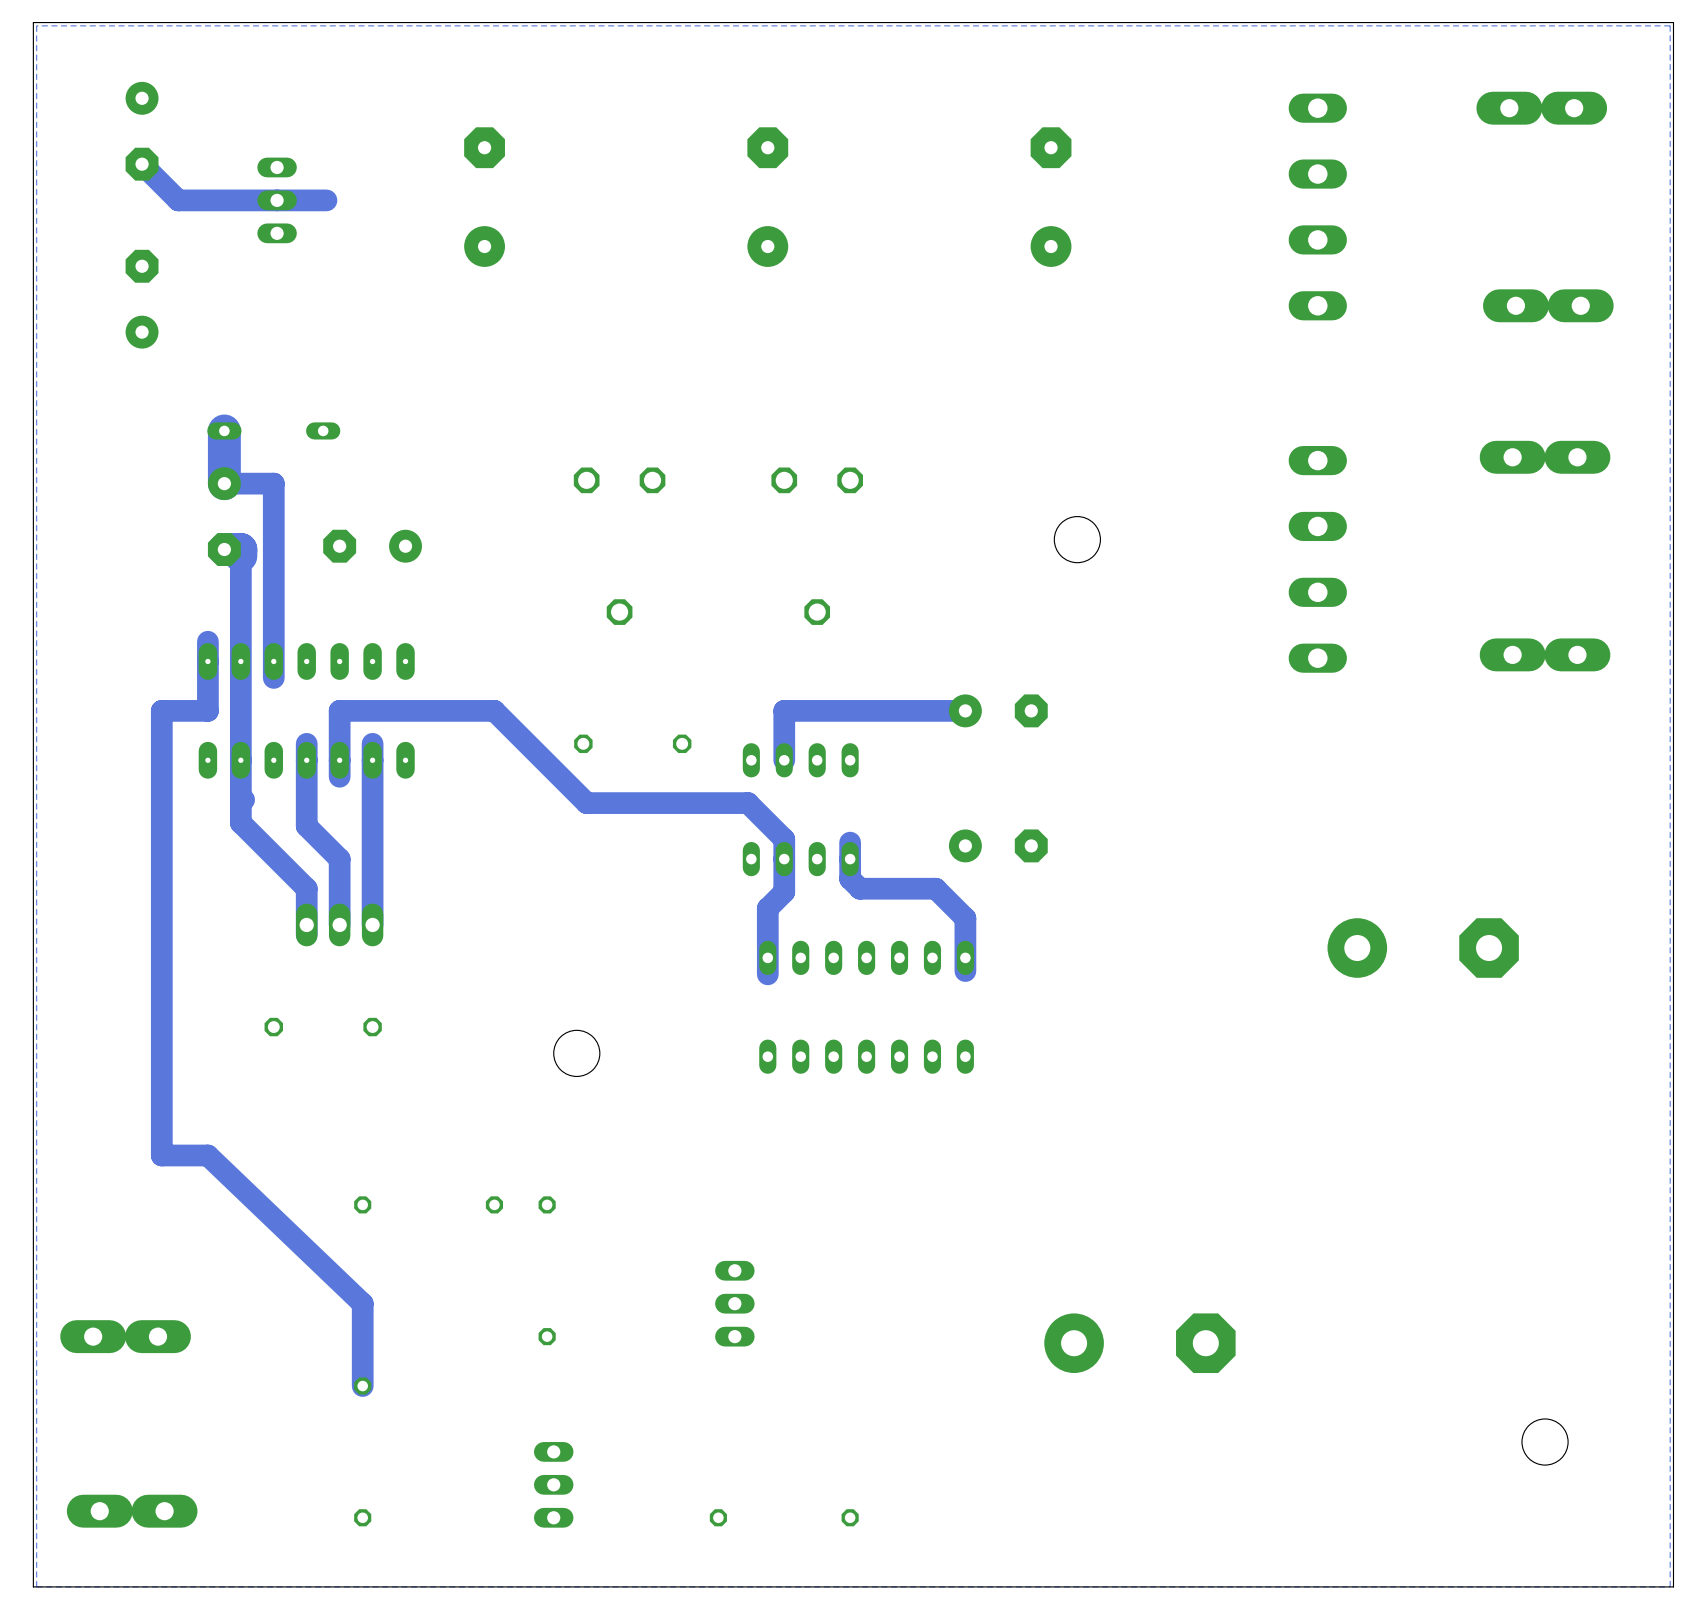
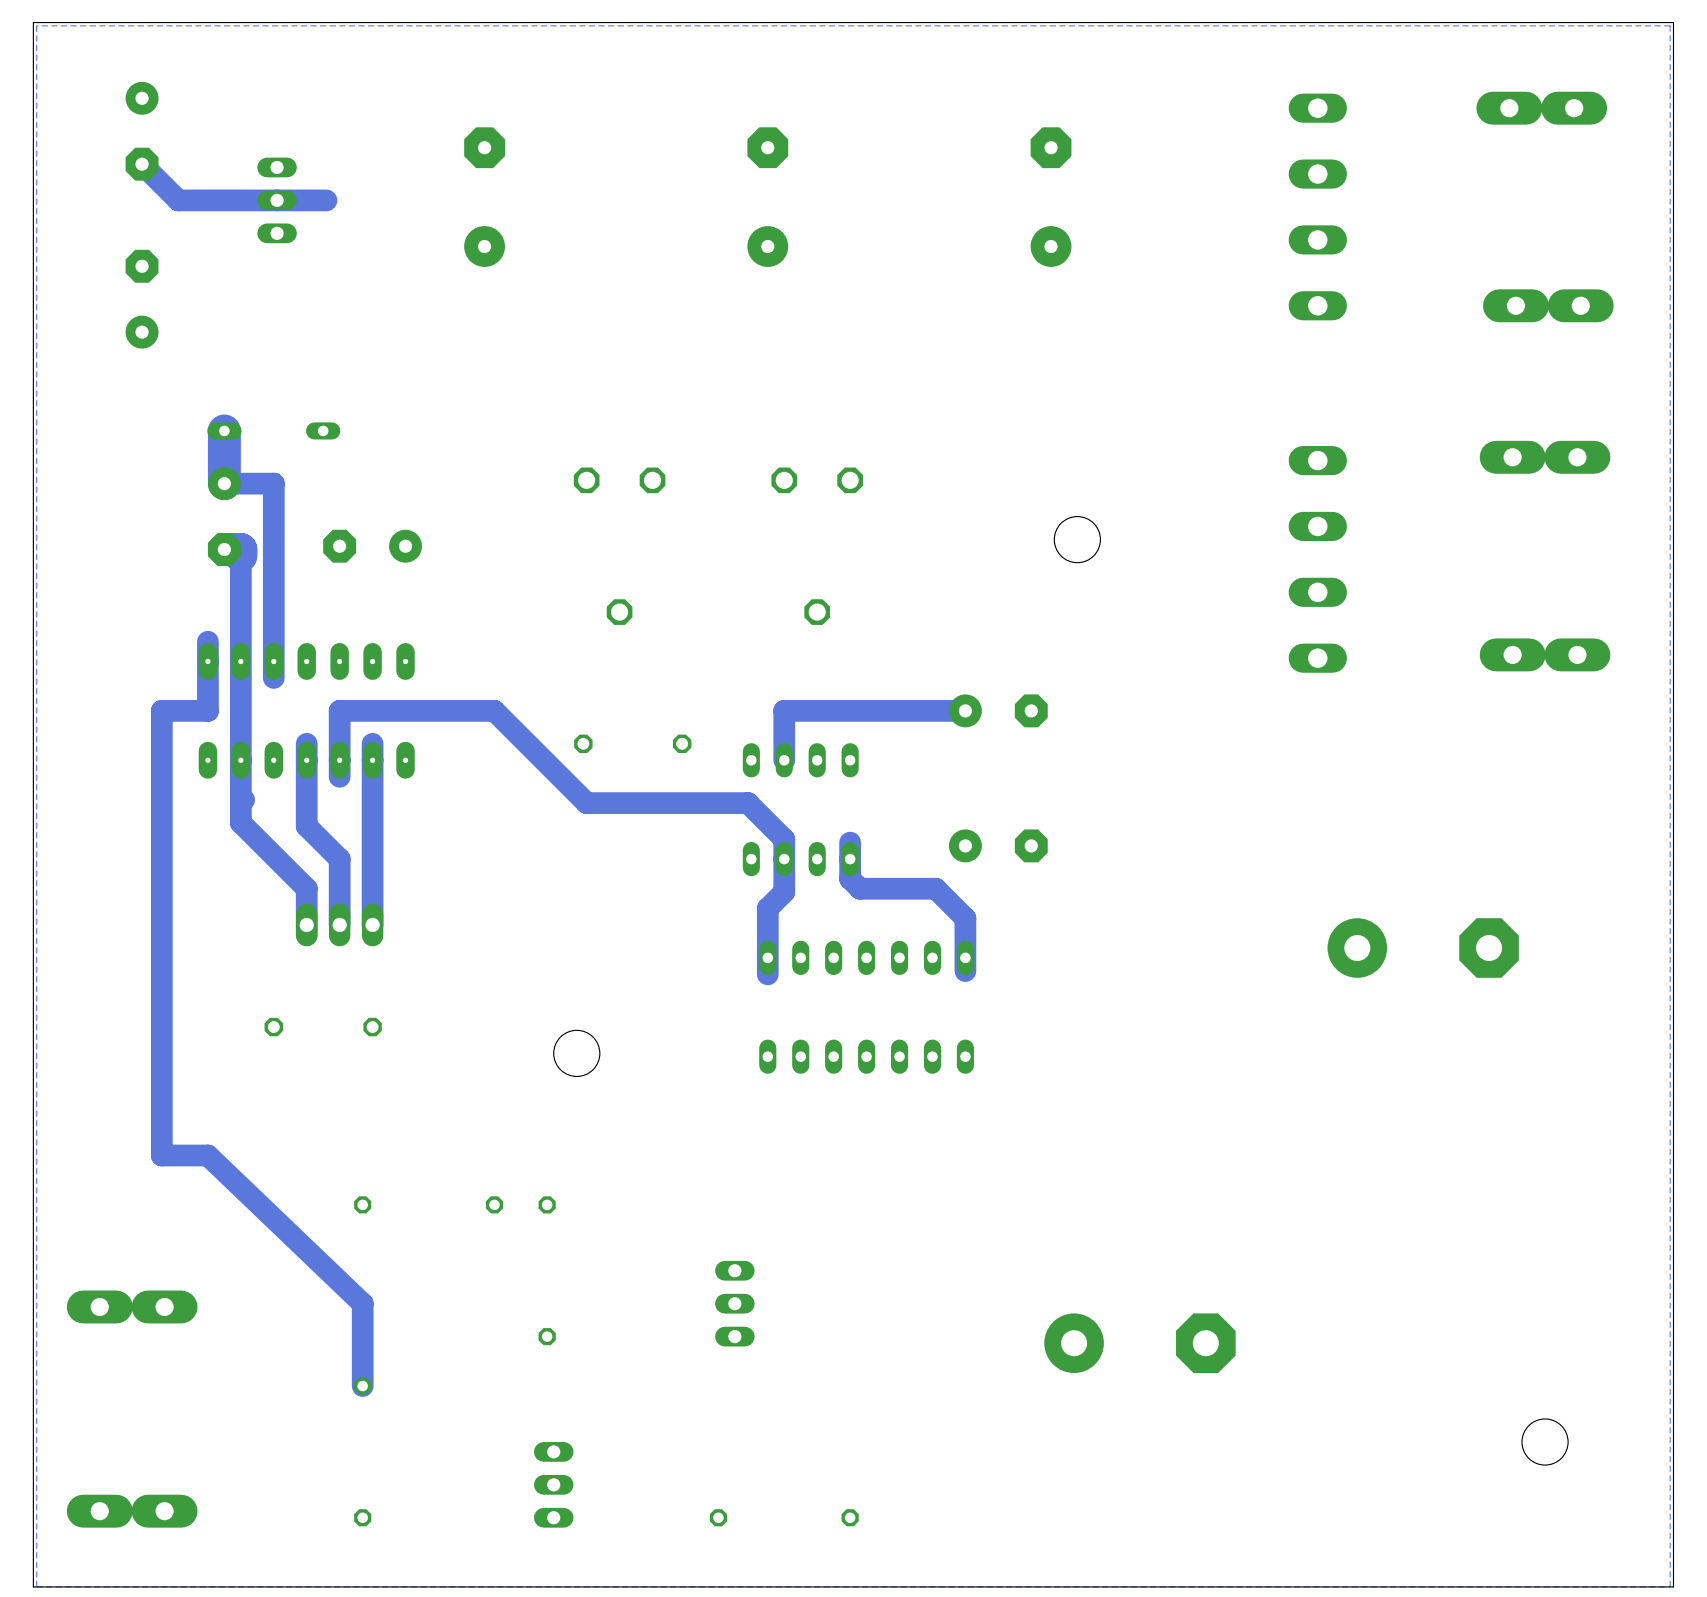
part position: (125, 1336) -> (132, 1306)

